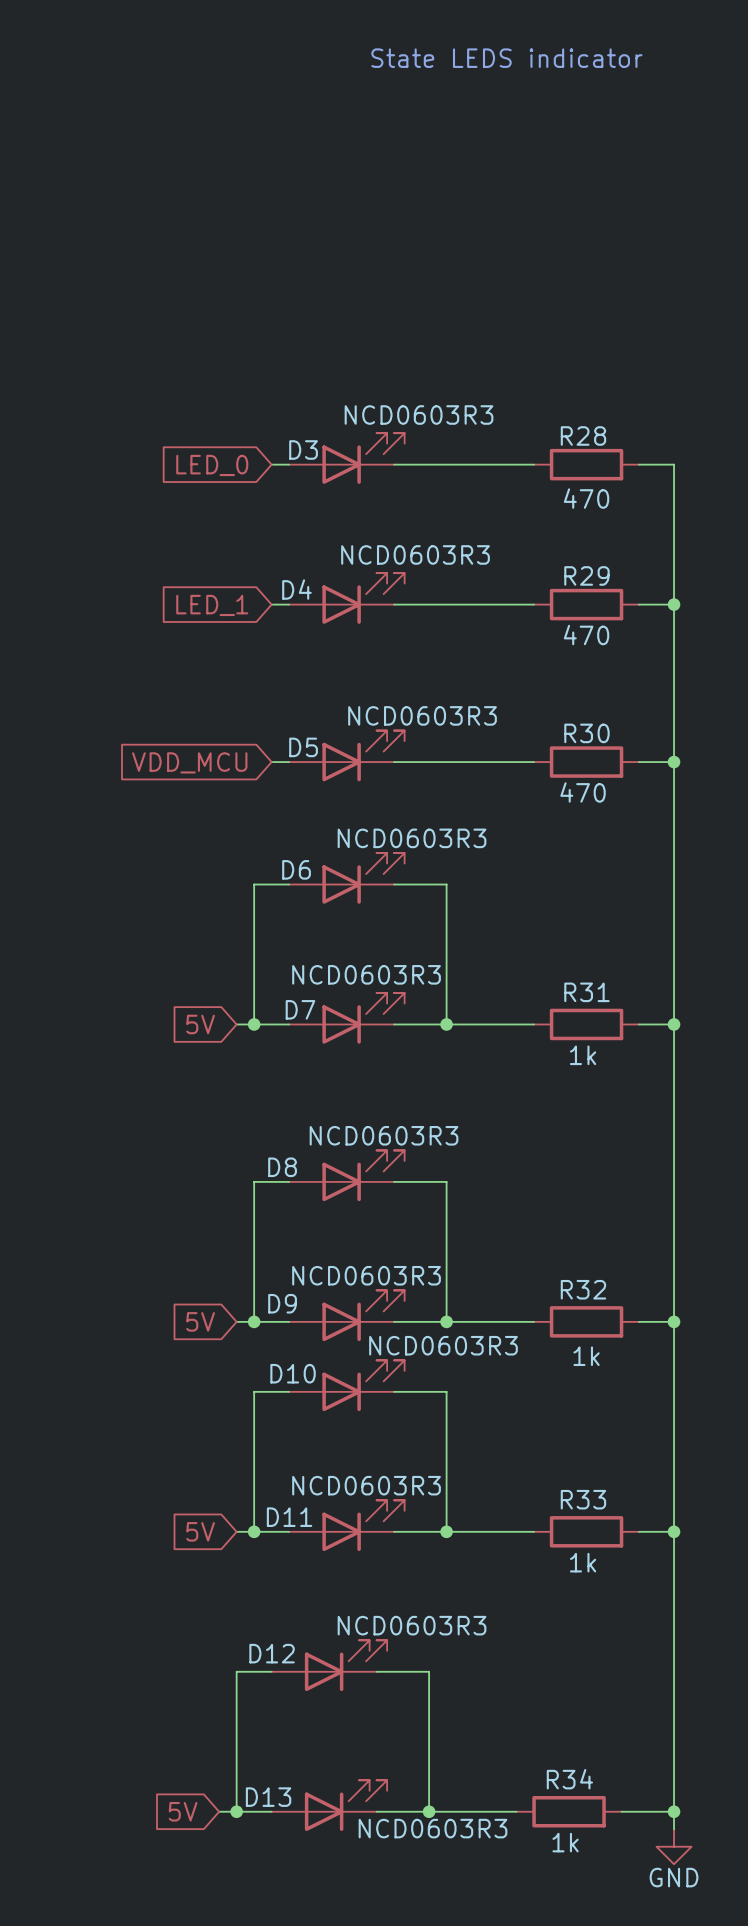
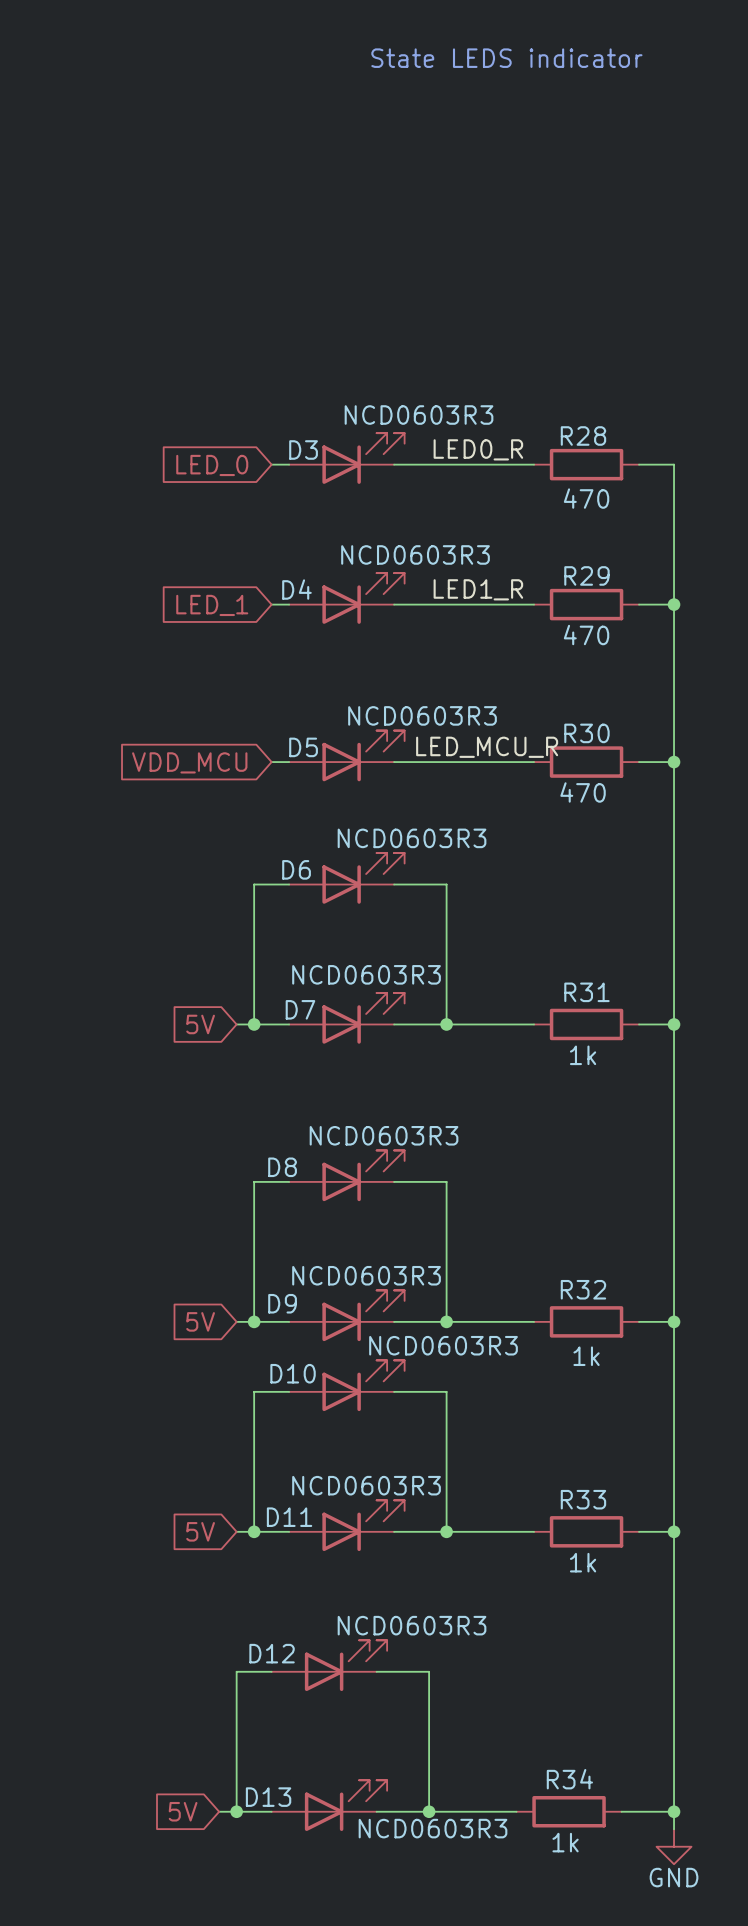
label: none -> LED0_R (478, 449)
label: none -> LED1_R (478, 589)
label: none -> LED_MCU_R (487, 747)

